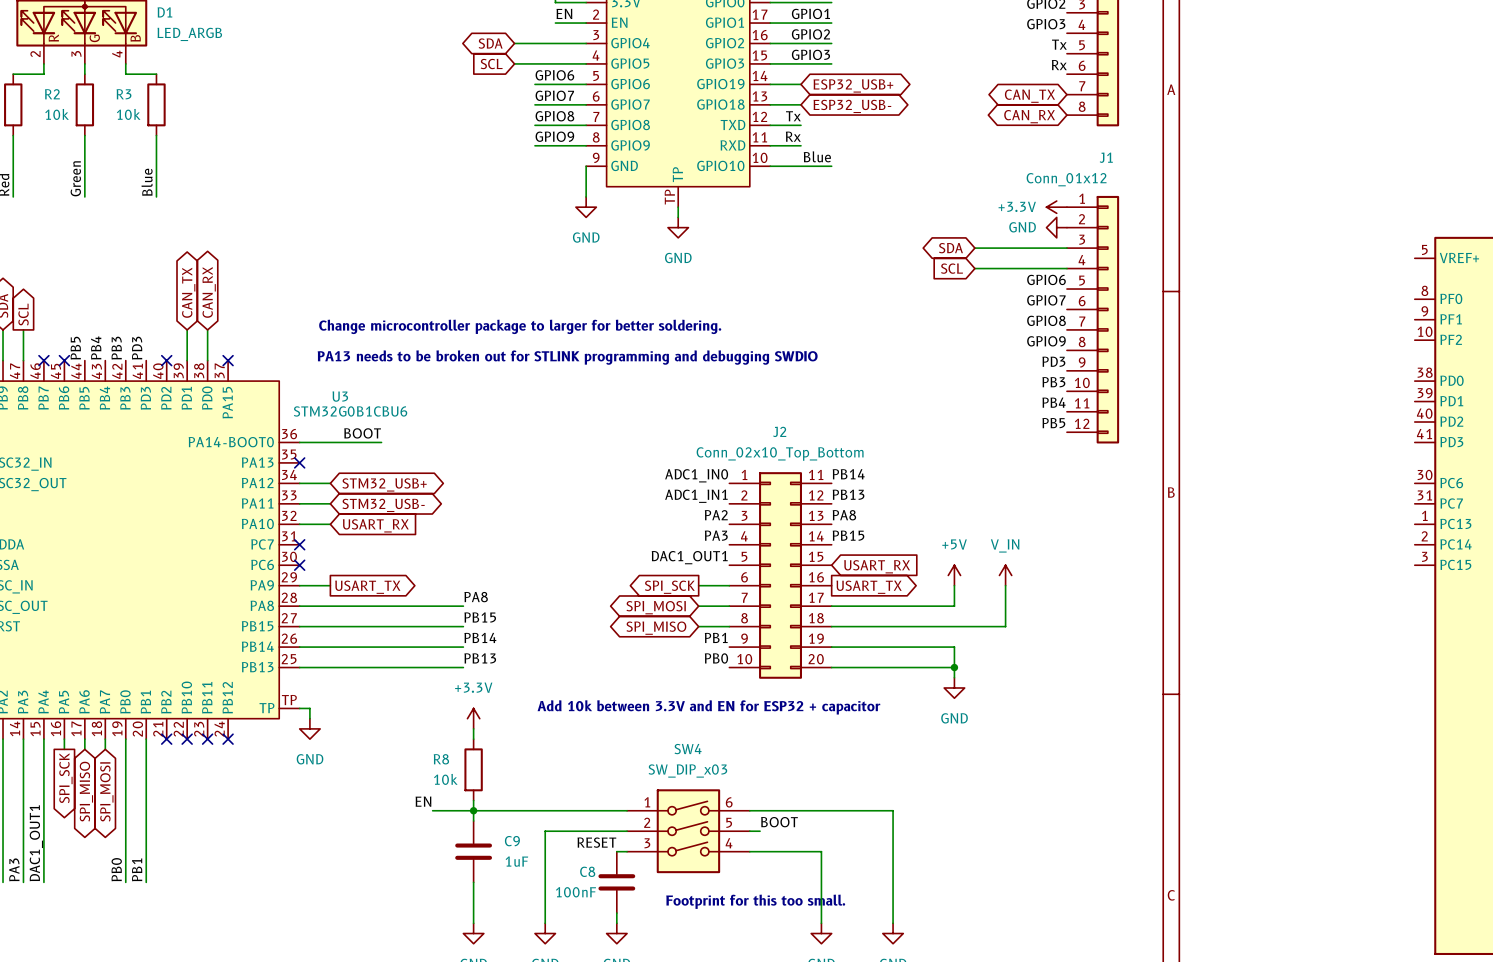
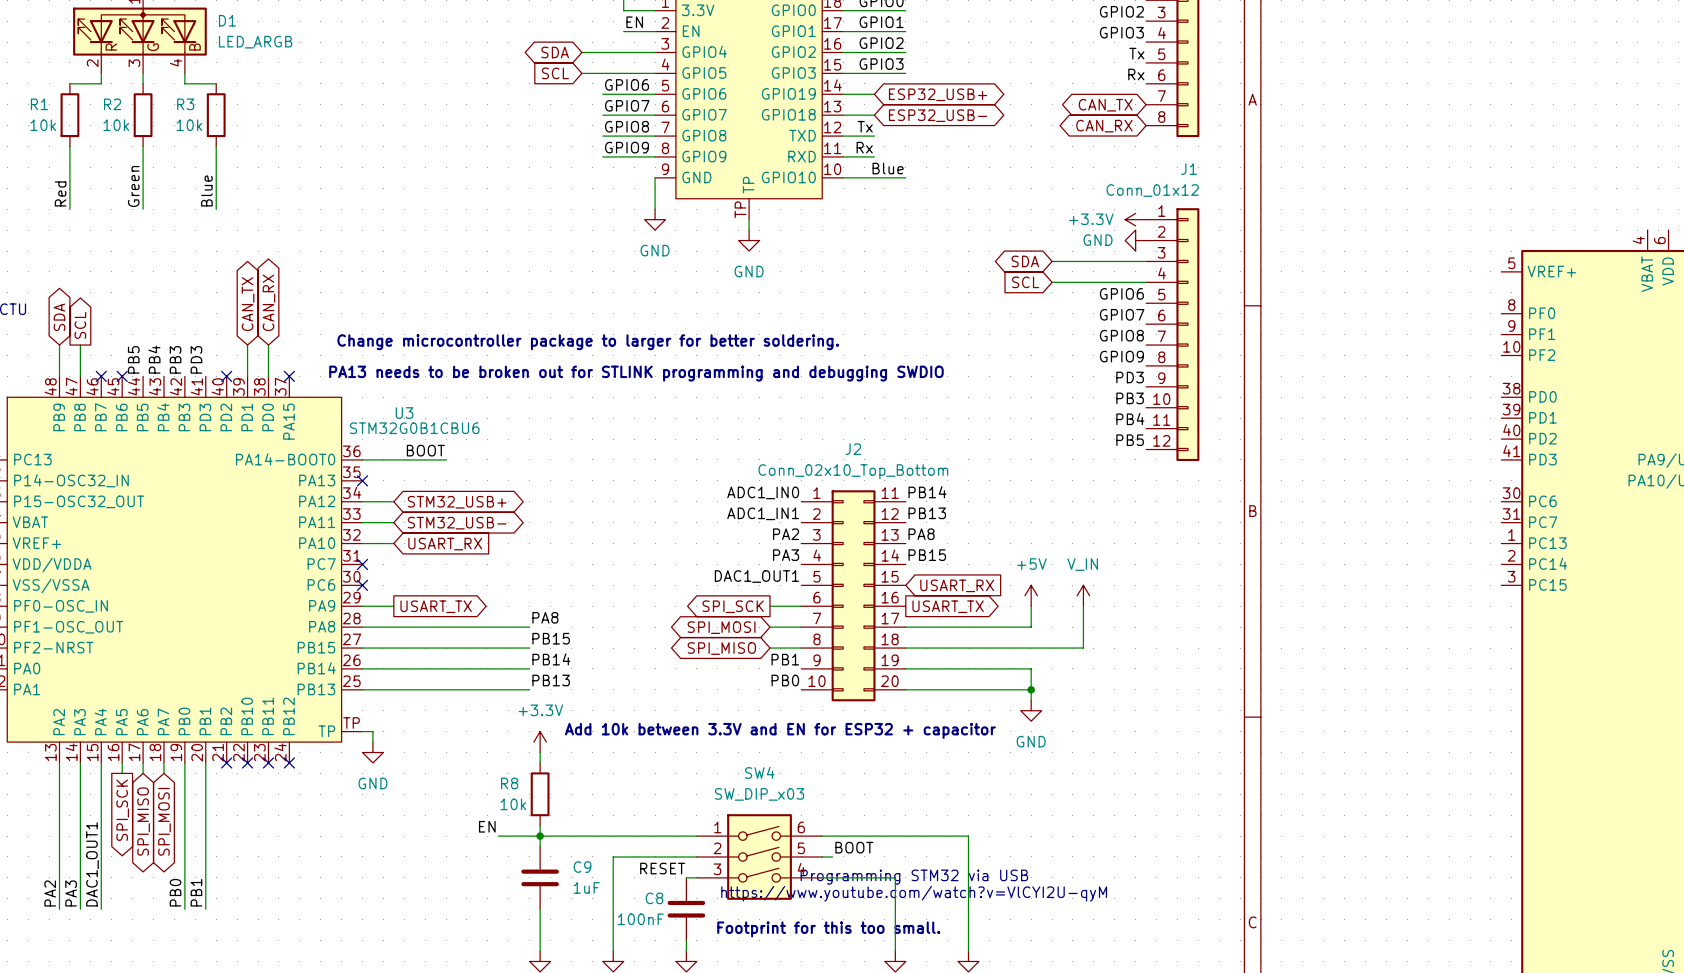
text: none -> Programming STM32 via USB (914, 877)
text: none -> https://www.youtube.com/watch?v=VlCYI2U-qyM (914, 893)

